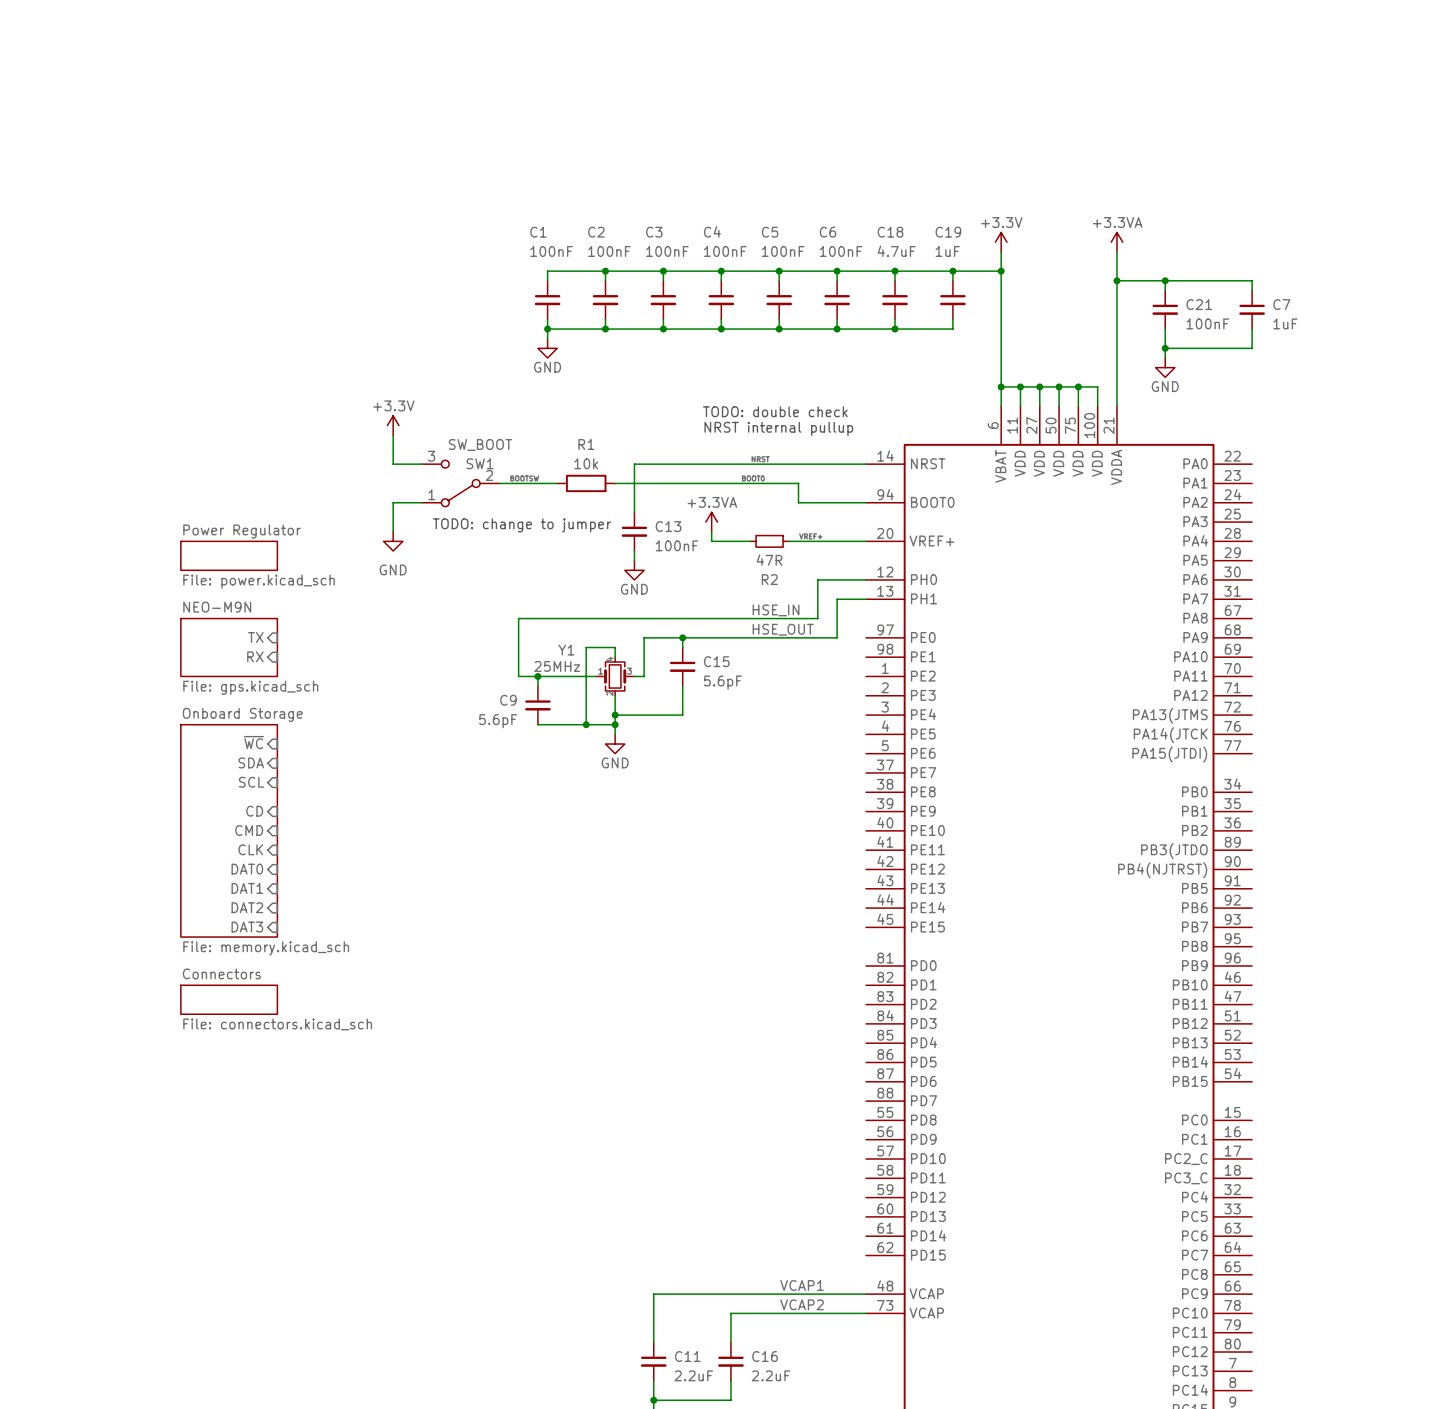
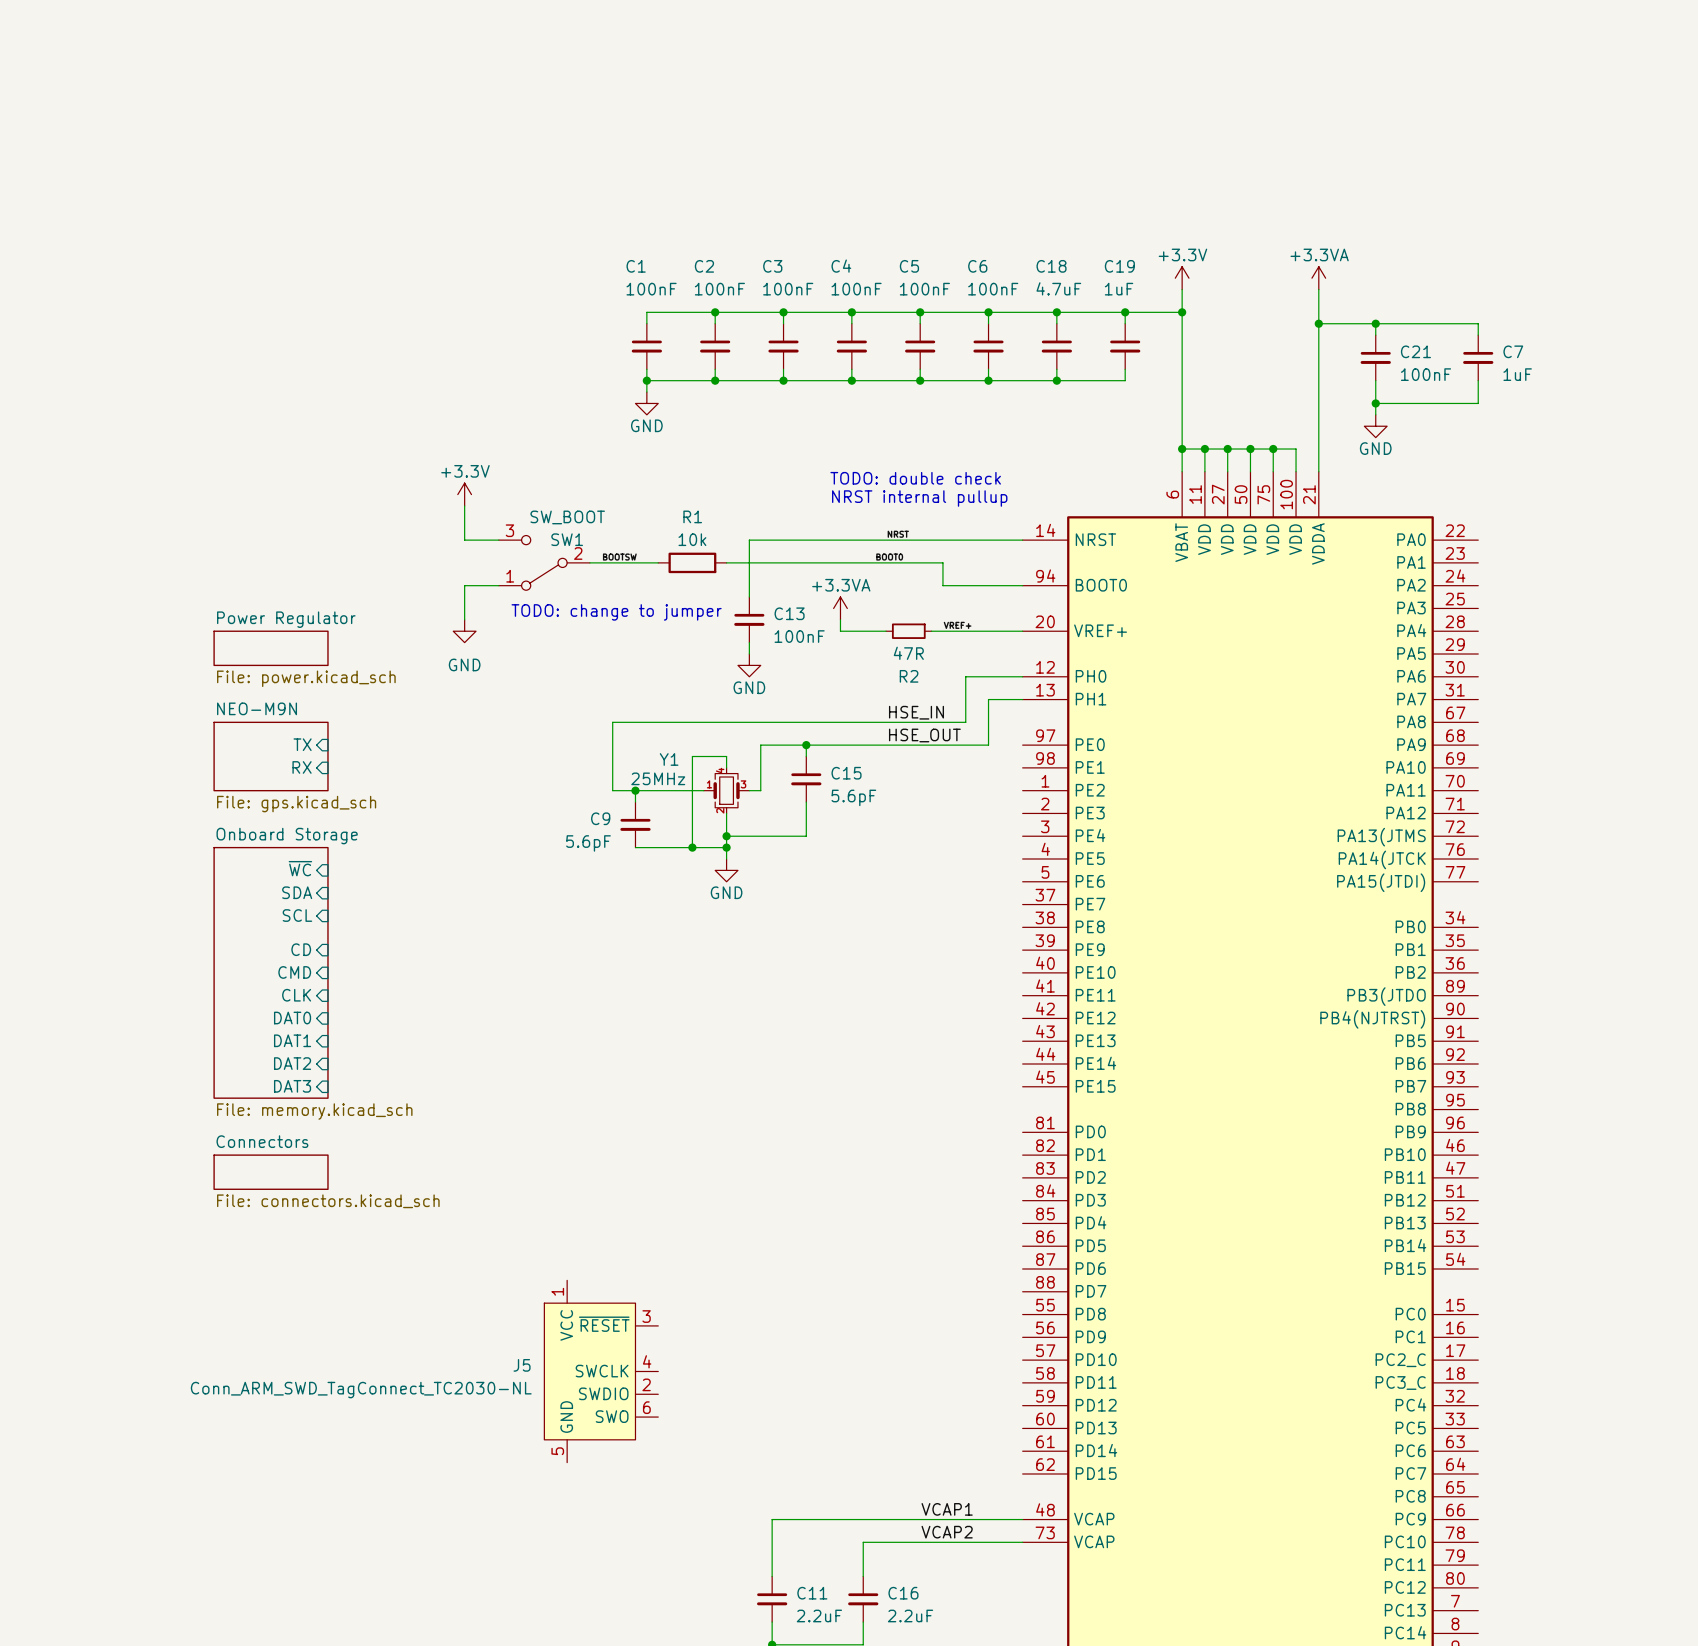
J5: none -> Conn_ARM_SWD_TagConnect_TC2030-NL (601, 1371)

